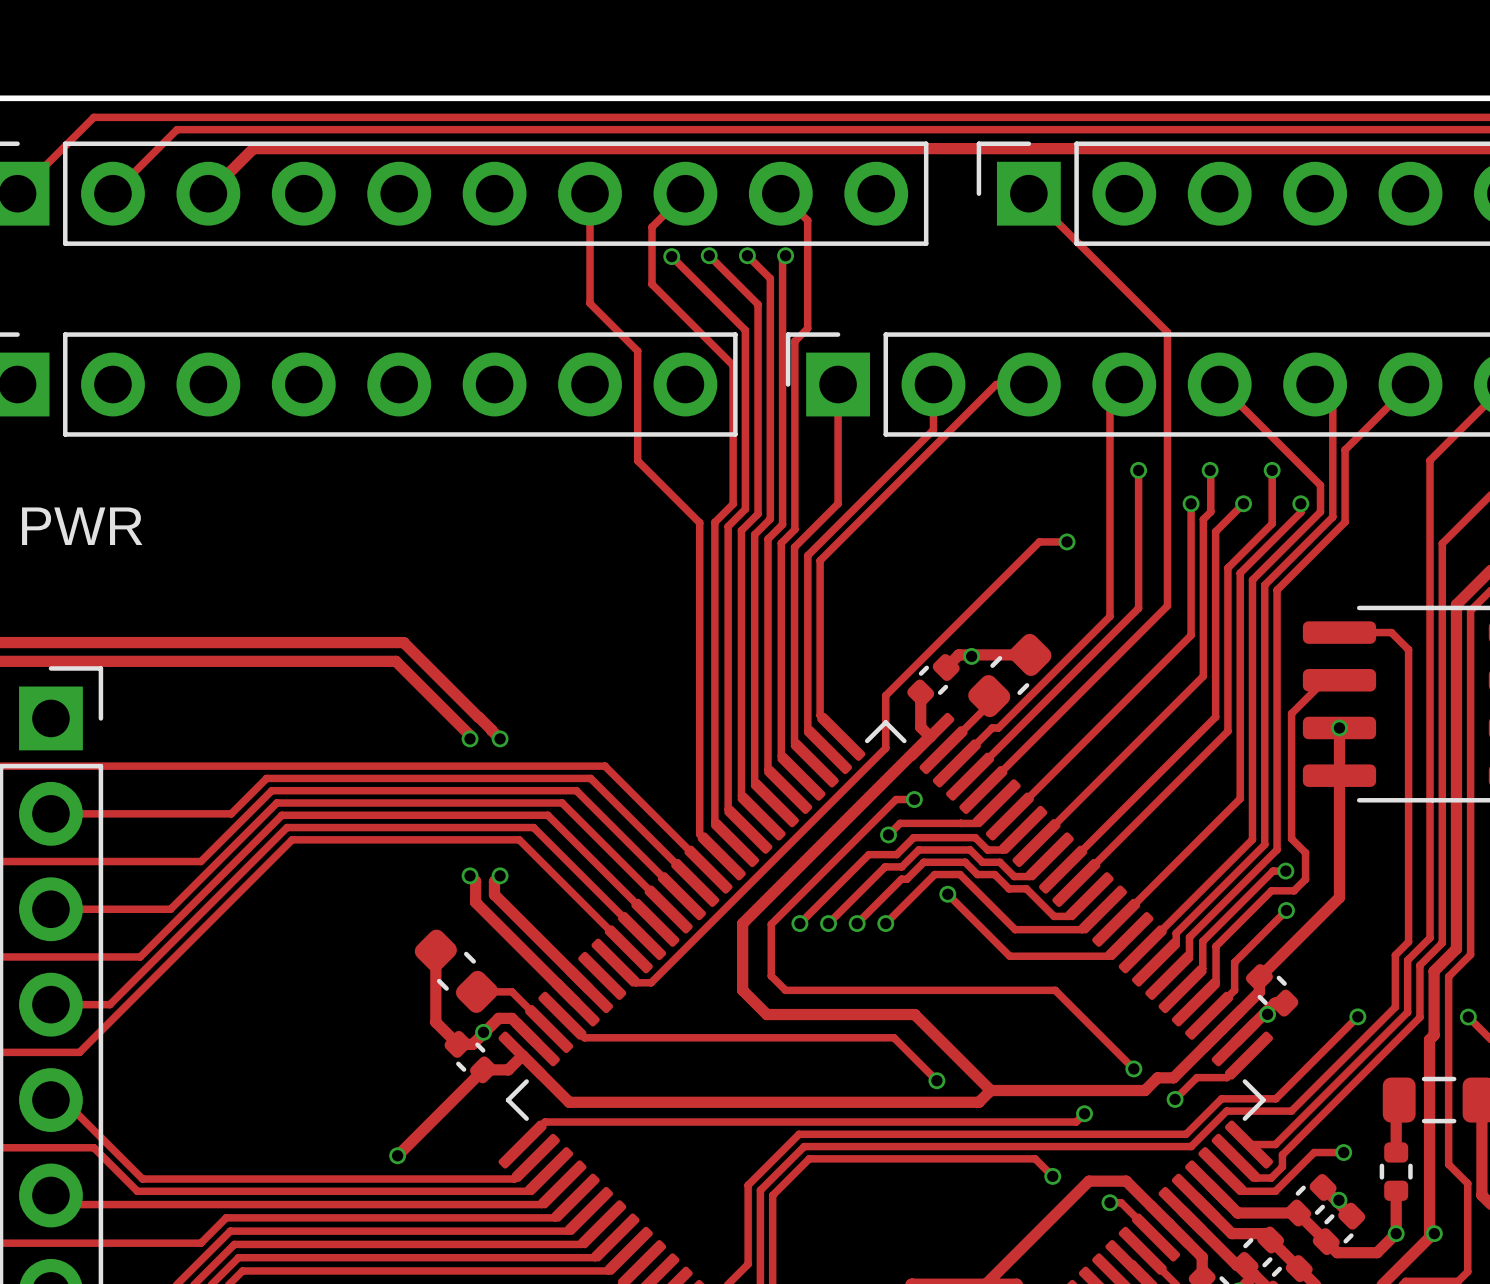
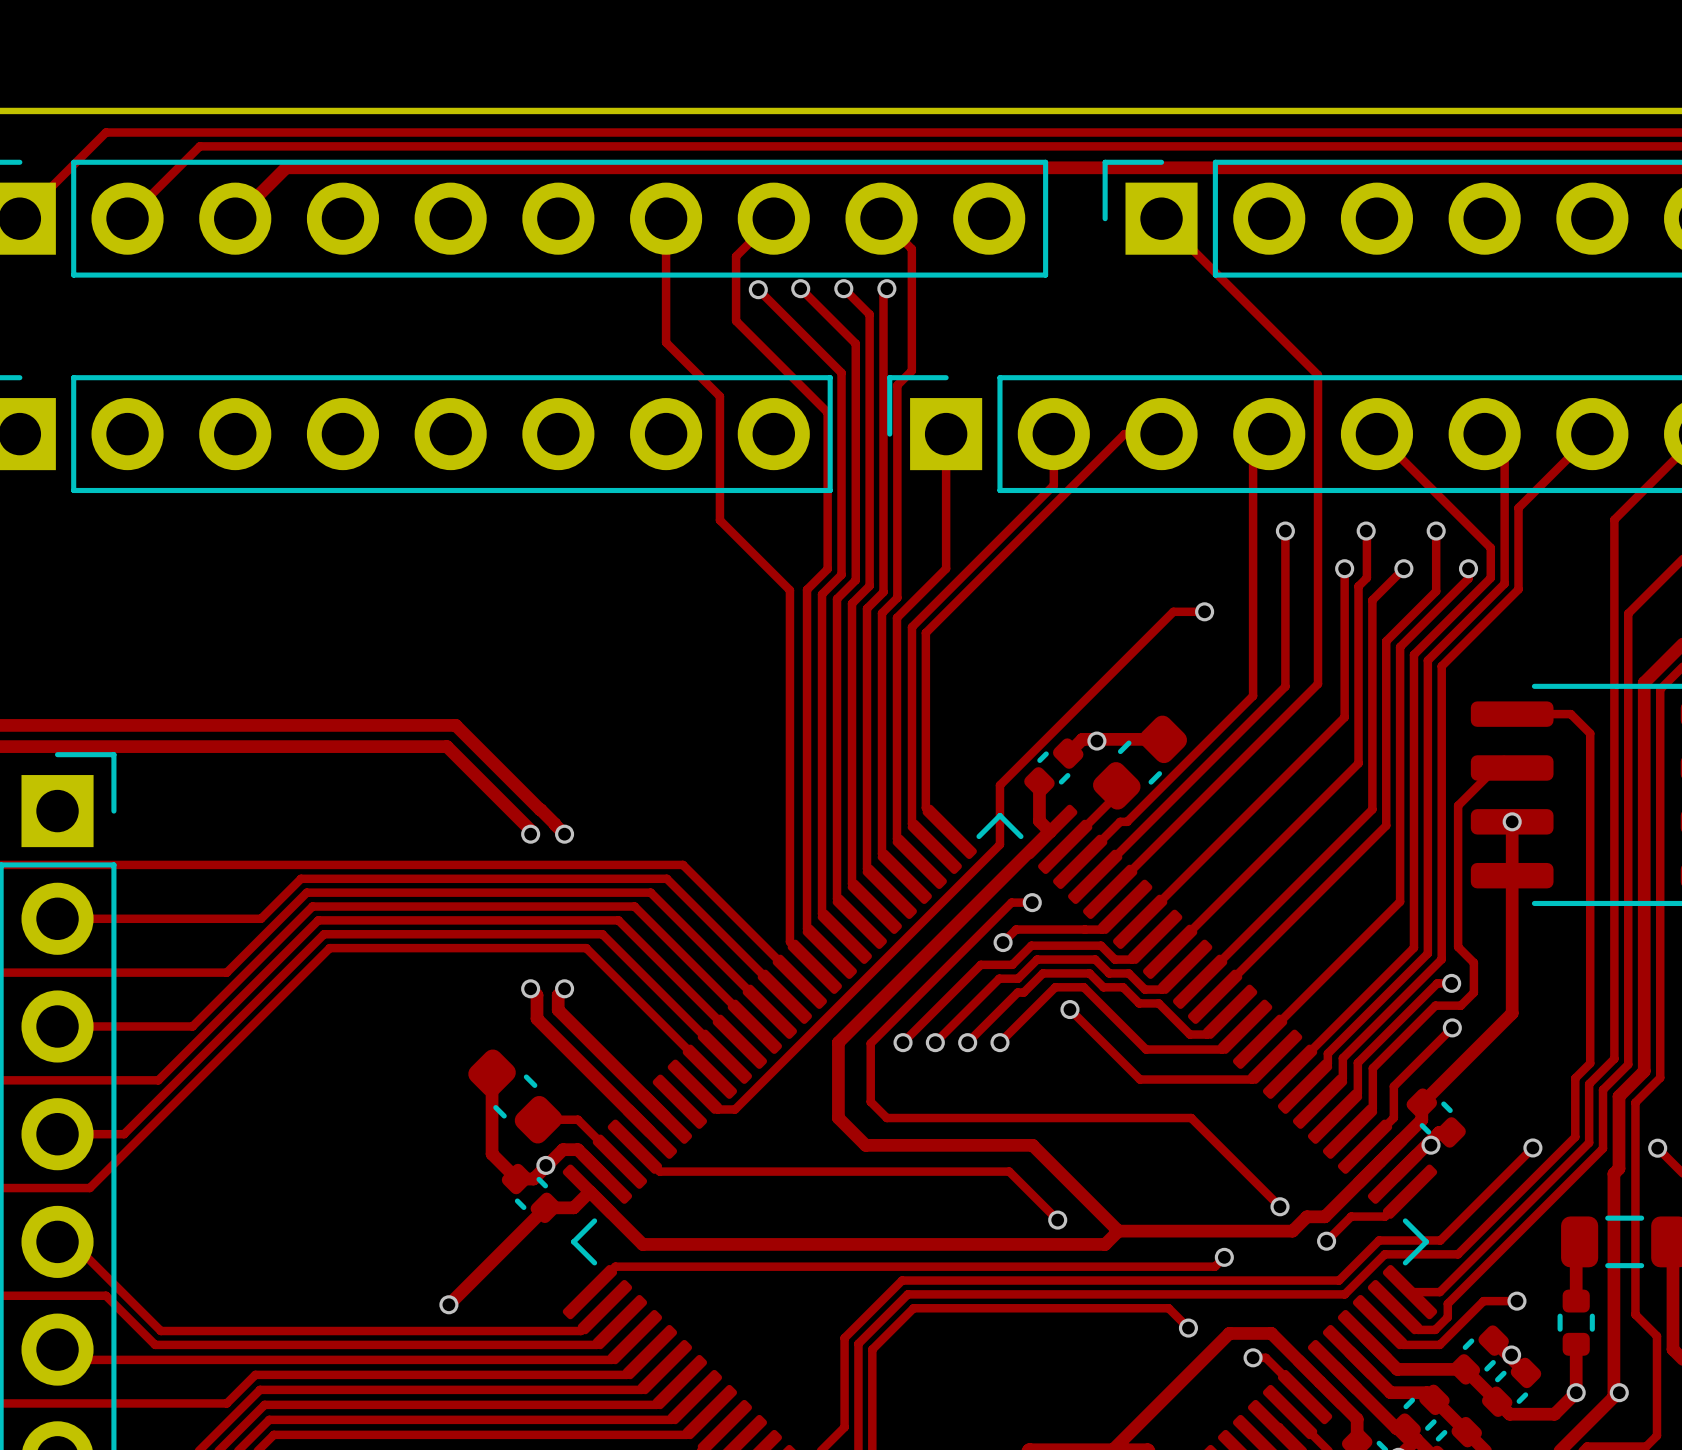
text: PWR (82, 526) -> none

